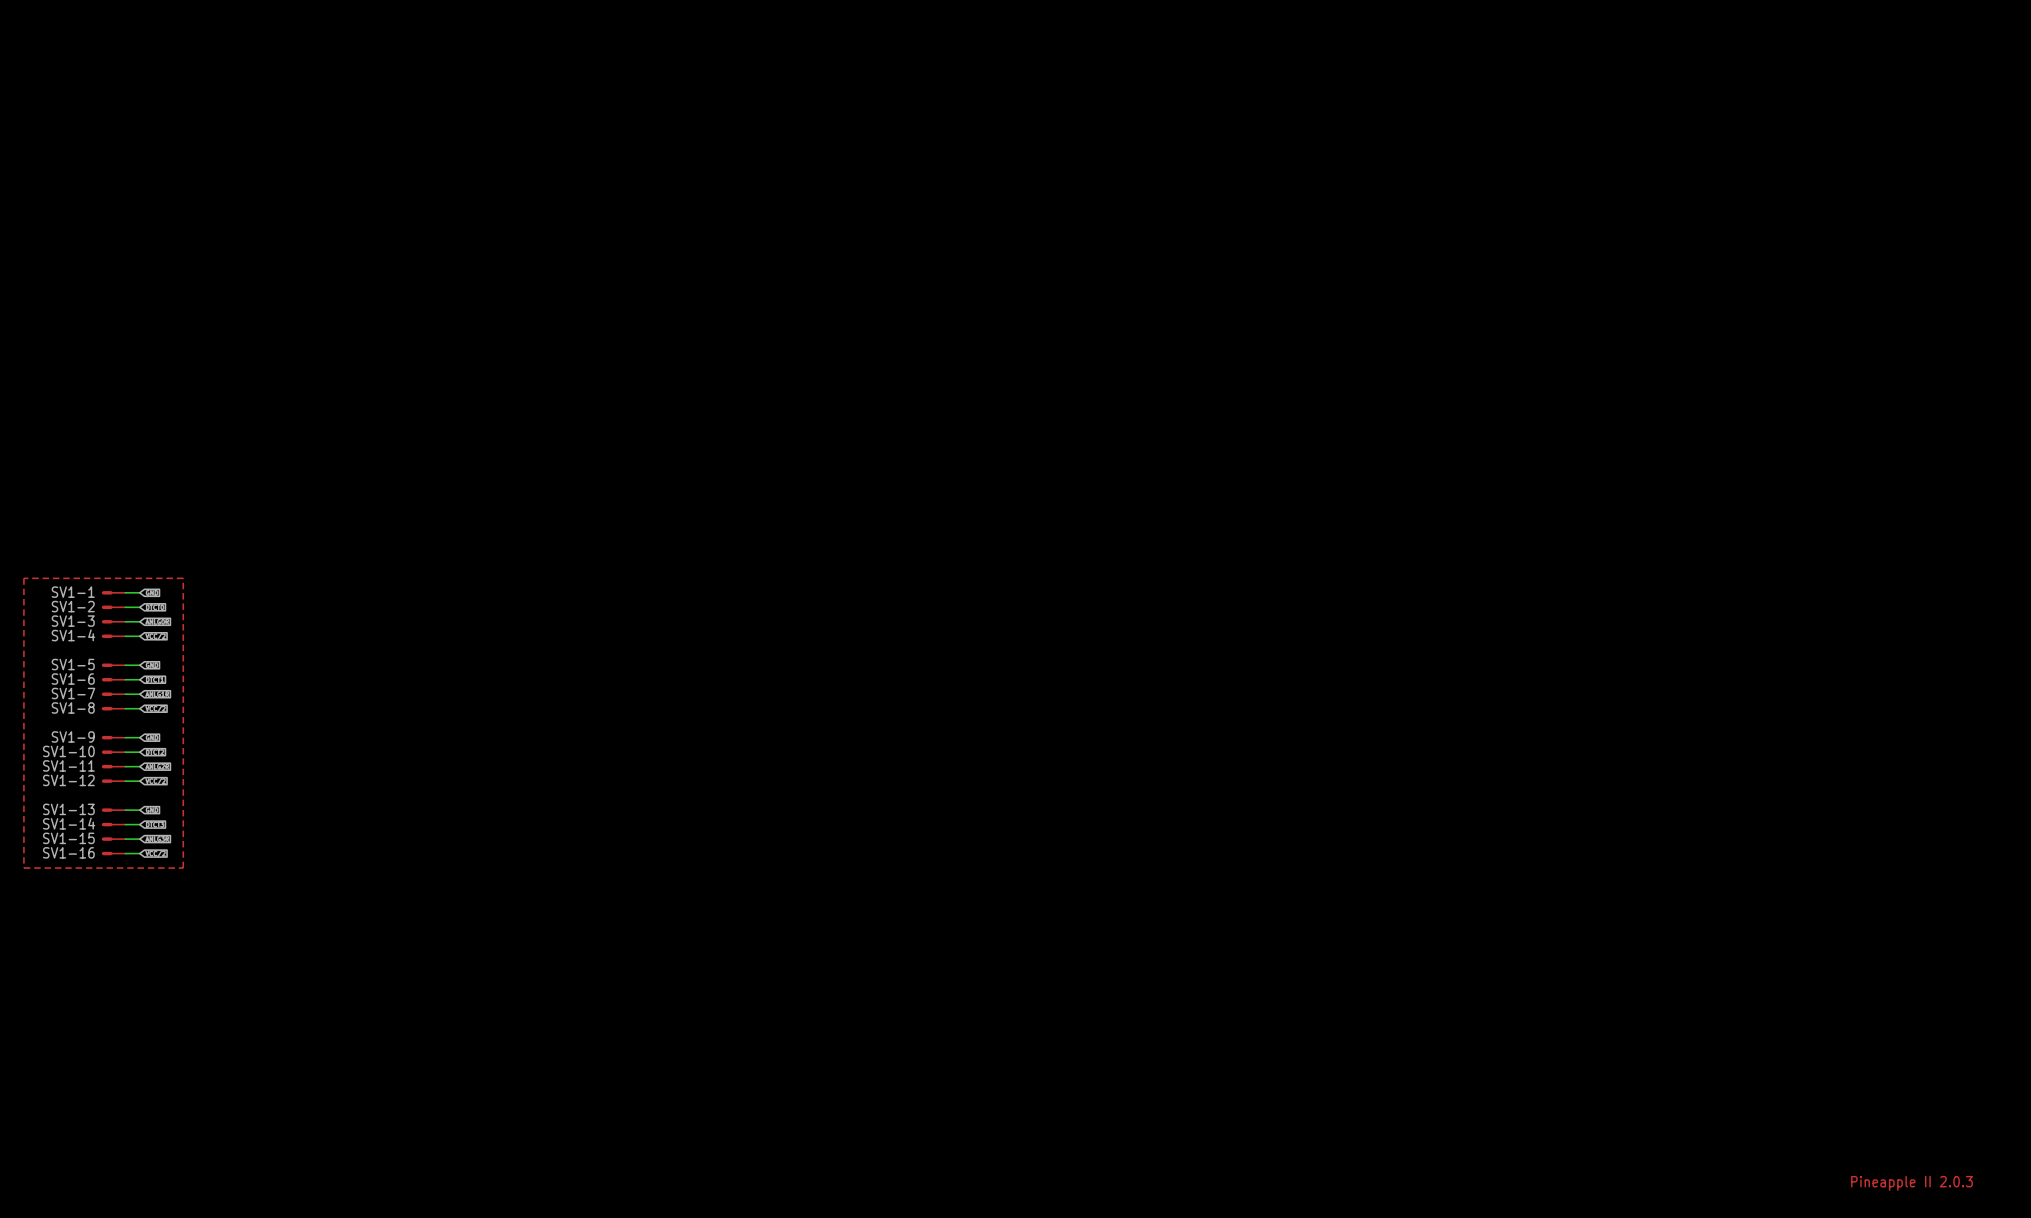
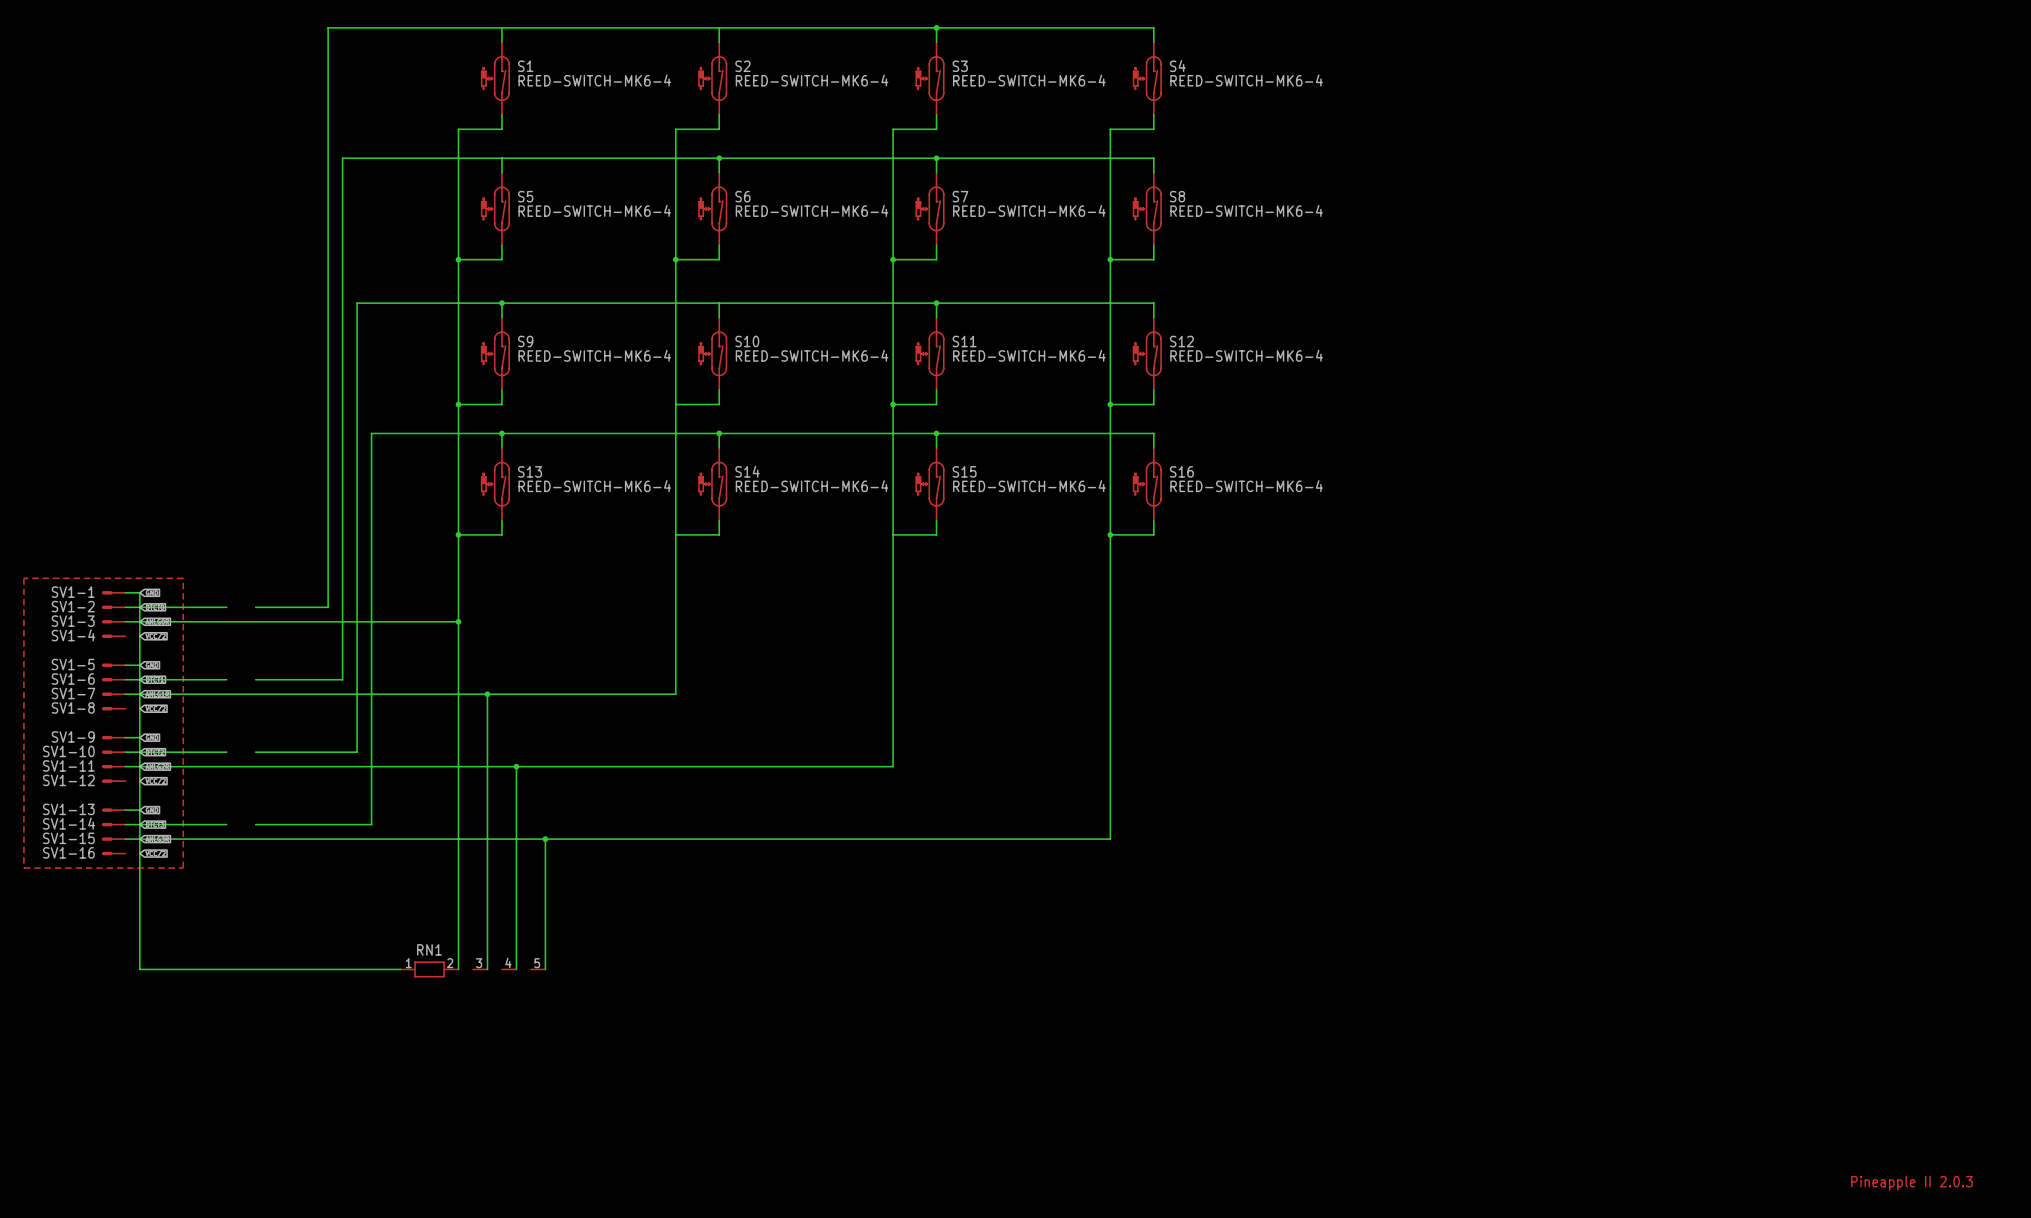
wire: none -> (501, 27) (501, 42)
wire: none -> (719, 27) (719, 42)
wire: none -> (936, 27) (936, 42)
junction: none -> (936, 27)
wire: none -> (1153, 42) (1153, 27) (328, 27) (328, 607) (255, 607)
S1: none -> REED-SWITCH-MK6-4 (495, 78)
S2: none -> REED-SWITCH-MK6-4 (712, 78)
S3: none -> REED-SWITCH-MK6-4 (930, 78)
S4: none -> REED-SWITCH-MK6-4 (1147, 78)
wire: none -> (501, 114) (501, 129) (458, 129) (458, 969)
wire: none -> (719, 114) (719, 129) (675, 129) (675, 694) (139, 694)
wire: none -> (936, 114) (936, 129) (893, 129) (893, 766) (139, 766)
wire: none -> (1153, 114) (1153, 129) (1110, 129) (1110, 839) (139, 839)
wire: none -> (501, 158) (501, 172)
wire: none -> (719, 158) (719, 172)
junction: none -> (719, 158)
wire: none -> (936, 158) (936, 172)
junction: none -> (936, 158)
wire: none -> (1153, 172) (1153, 158) (342, 158) (342, 679) (255, 679)
S5: none -> REED-SWITCH-MK6-4 (495, 208)
S6: none -> REED-SWITCH-MK6-4 (712, 208)
S7: none -> REED-SWITCH-MK6-4 (930, 208)
S8: none -> REED-SWITCH-MK6-4 (1147, 208)
wire: none -> (501, 245) (501, 259) (458, 259)
wire: none -> (719, 245) (719, 259) (675, 259)
wire: none -> (936, 245) (936, 259) (893, 259)
wire: none -> (1153, 245) (1153, 259) (1110, 259)
junction: none -> (458, 259)
junction: none -> (675, 259)
junction: none -> (893, 259)
junction: none -> (1110, 259)
wire: none -> (501, 303) (501, 317)
junction: none -> (501, 303)
wire: none -> (719, 303) (719, 317)
wire: none -> (936, 303) (936, 317)
junction: none -> (936, 303)
wire: none -> (1153, 317) (1153, 303) (357, 303) (357, 752) (255, 752)
S9: none -> REED-SWITCH-MK6-4 (495, 353)
S10: none -> REED-SWITCH-MK6-4 (712, 353)
S11: none -> REED-SWITCH-MK6-4 (930, 353)
S12: none -> REED-SWITCH-MK6-4 (1147, 353)
wire: none -> (501, 390) (501, 404) (458, 404)
wire: none -> (719, 390) (719, 404) (675, 404)
wire: none -> (936, 390) (936, 404) (893, 404)
wire: none -> (1153, 390) (1153, 404) (1110, 404)
junction: none -> (458, 404)
junction: none -> (893, 404)
junction: none -> (1110, 404)
wire: none -> (501, 433) (501, 447)
junction: none -> (501, 433)
wire: none -> (719, 433) (719, 447)
junction: none -> (719, 433)
wire: none -> (936, 433) (936, 447)
junction: none -> (936, 433)
wire: none -> (1153, 447) (1153, 433) (371, 433) (371, 824) (255, 824)
S13: none -> REED-SWITCH-MK6-4 (495, 484)
S14: none -> REED-SWITCH-MK6-4 (712, 484)
S15: none -> REED-SWITCH-MK6-4 (930, 484)
S16: none -> REED-SWITCH-MK6-4 (1147, 484)
wire: none -> (501, 520) (501, 534) (458, 534)
wire: none -> (719, 520) (719, 534) (675, 534)
wire: none -> (936, 520) (936, 534) (893, 534)
wire: none -> (1153, 520) (1153, 534) (1110, 534)
junction: none -> (458, 534)
junction: none -> (1110, 534)
wire: none -> (139, 592) (139, 969) (400, 969)
wire: none -> (139, 607) (226, 607)
wire: none -> (139, 621) (458, 621)
junction: none -> (458, 621)
wire: (125, 636) (139, 636) -> none
wire: none -> (139, 679) (226, 679)
wire: none -> (487, 694) (487, 969)
junction: none -> (487, 694)
wire: (125, 708) (139, 708) -> none
wire: none -> (139, 752) (226, 752)
wire: none -> (516, 766) (516, 969)
junction: none -> (516, 766)
wire: (125, 781) (139, 781) -> none
wire: none -> (139, 824) (226, 824)
wire: none -> (545, 839) (545, 969)
junction: none -> (545, 839)
wire: (125, 853) (139, 853) -> none
RN1: none -> (472, 969)

